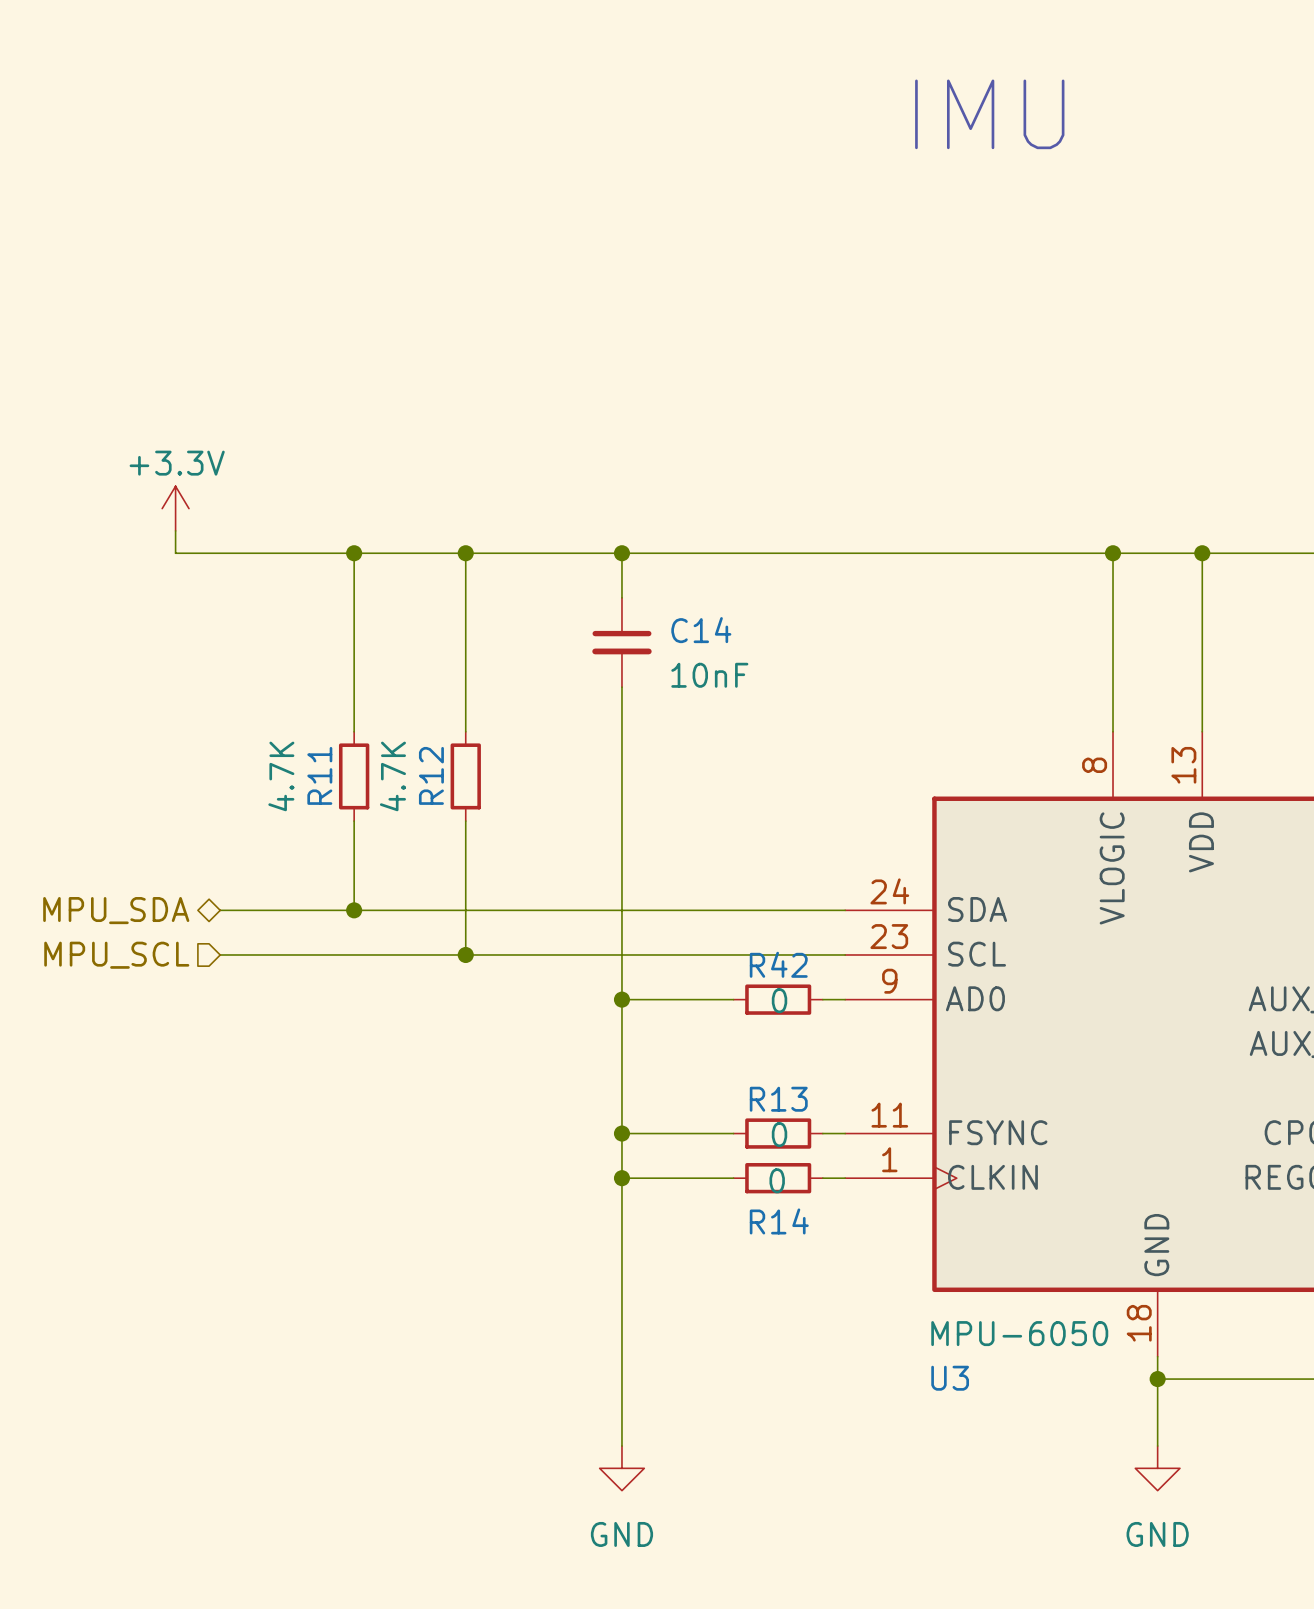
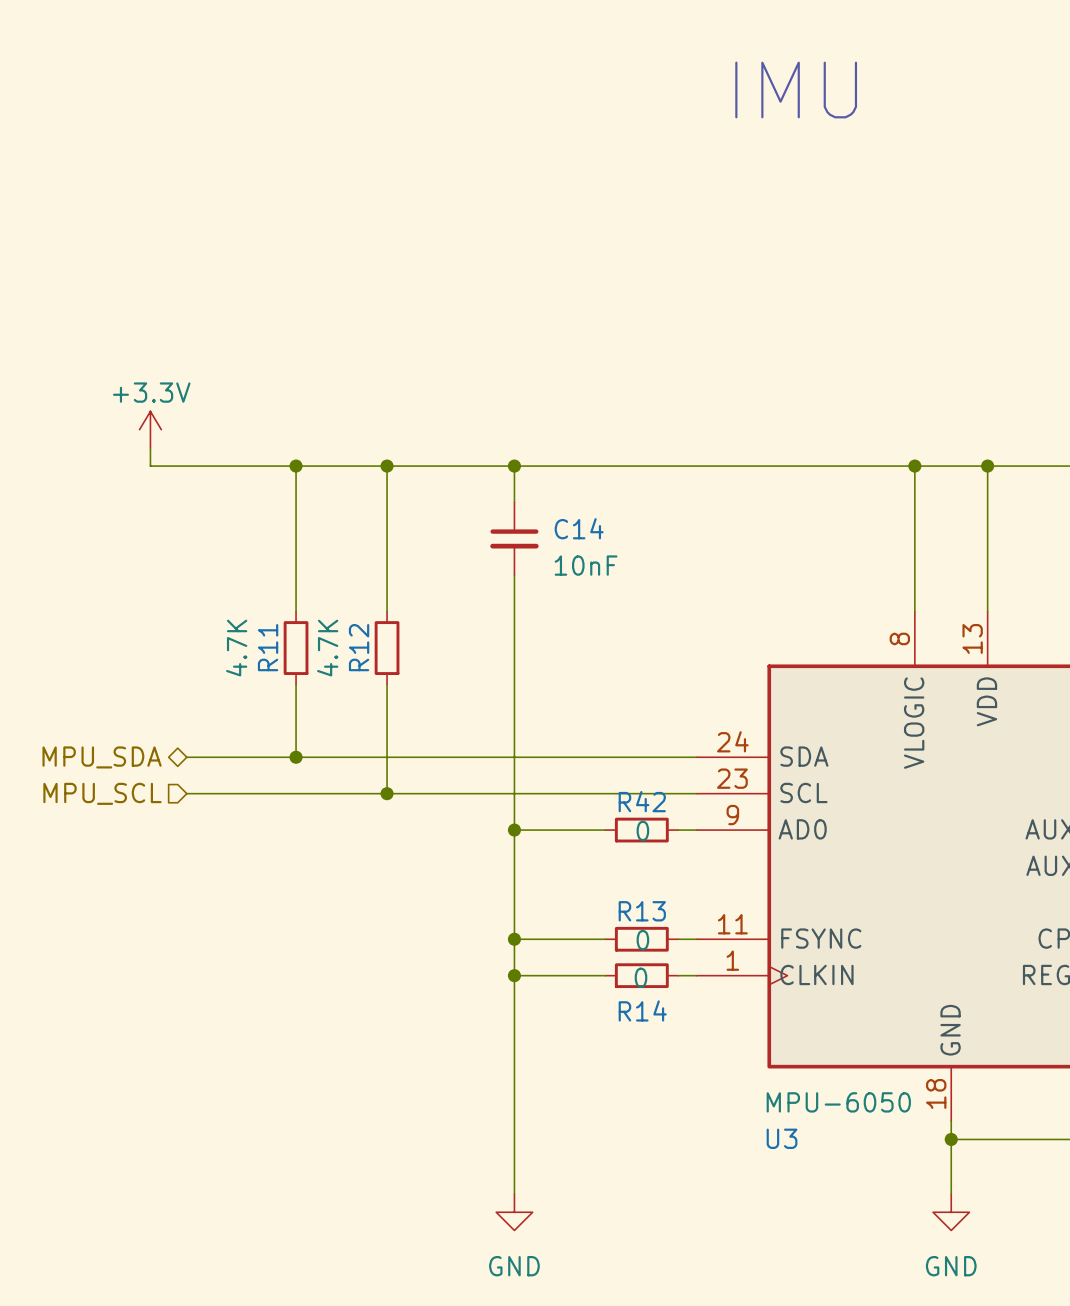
text position: IMU (989, 114) -> IMU (796, 89)

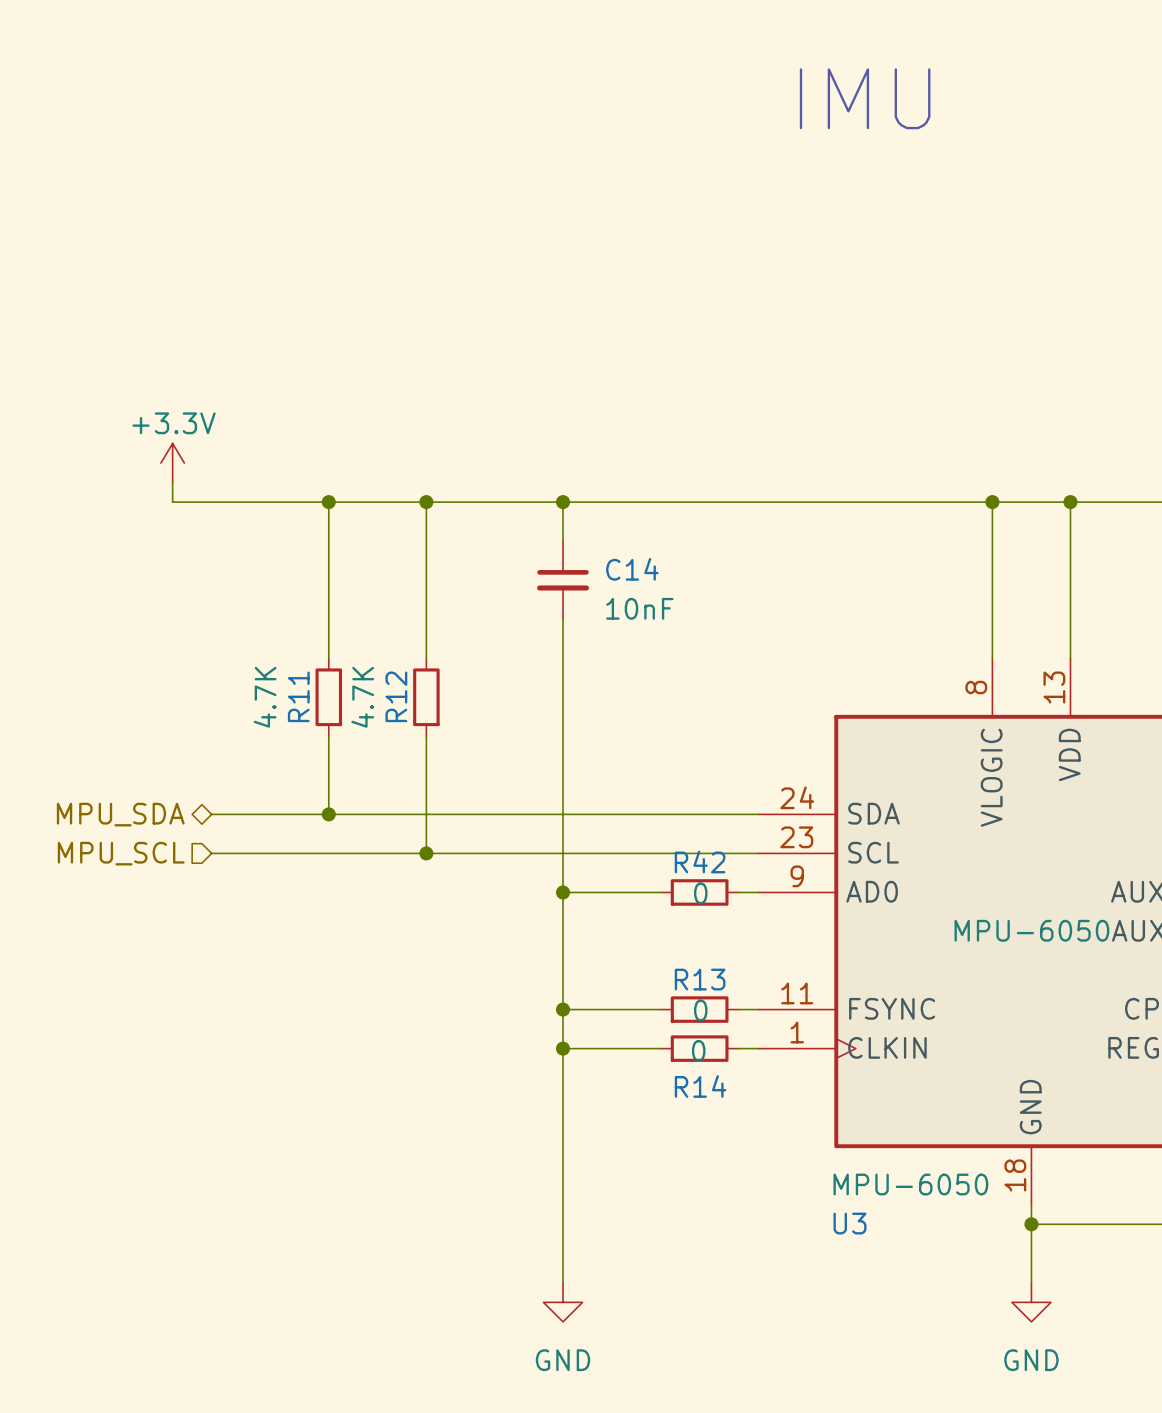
U3 text: none -> MPU-6050 (1031, 930)

